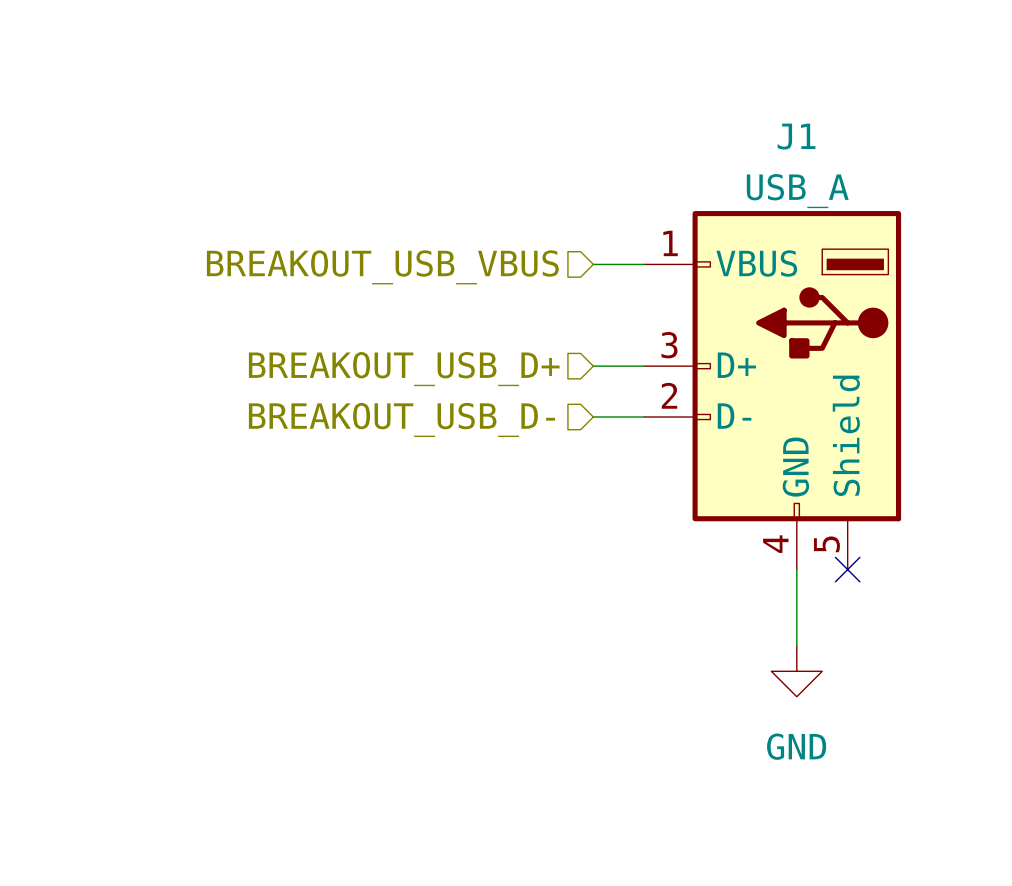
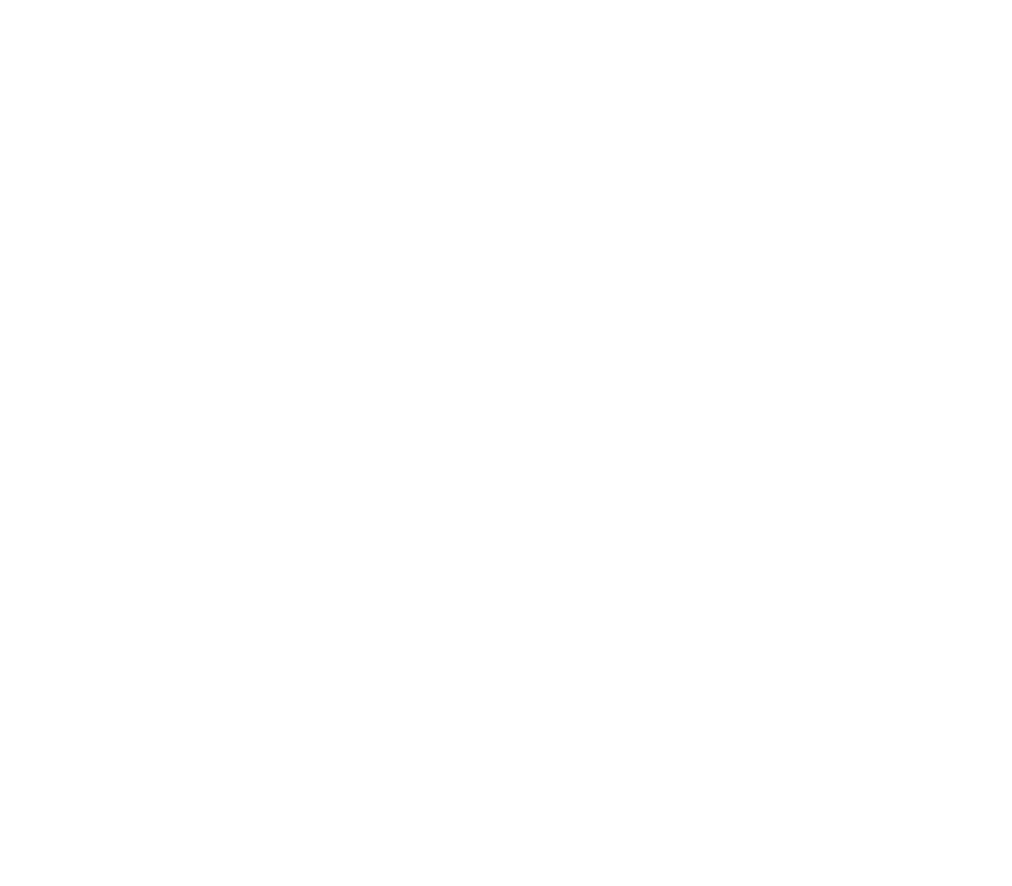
wire: (593, 264) (644, 264) -> none
hierarchical label: BREAKOUT_USB_VBUS (382, 267) -> none
wire: (593, 366) (644, 366) -> none
hierarchical label: BREAKOUT_USB_D+ (404, 369) -> none
J1: USB_A (772, 390) -> none
wire: (593, 417) (644, 417) -> none
hierarchical label: BREAKOUT_USB_D- (401, 419) -> none
wire: (796, 569) (796, 645) -> none
no-connect mark: (847, 569) -> none
power symbol: GND (796, 671) -> none

